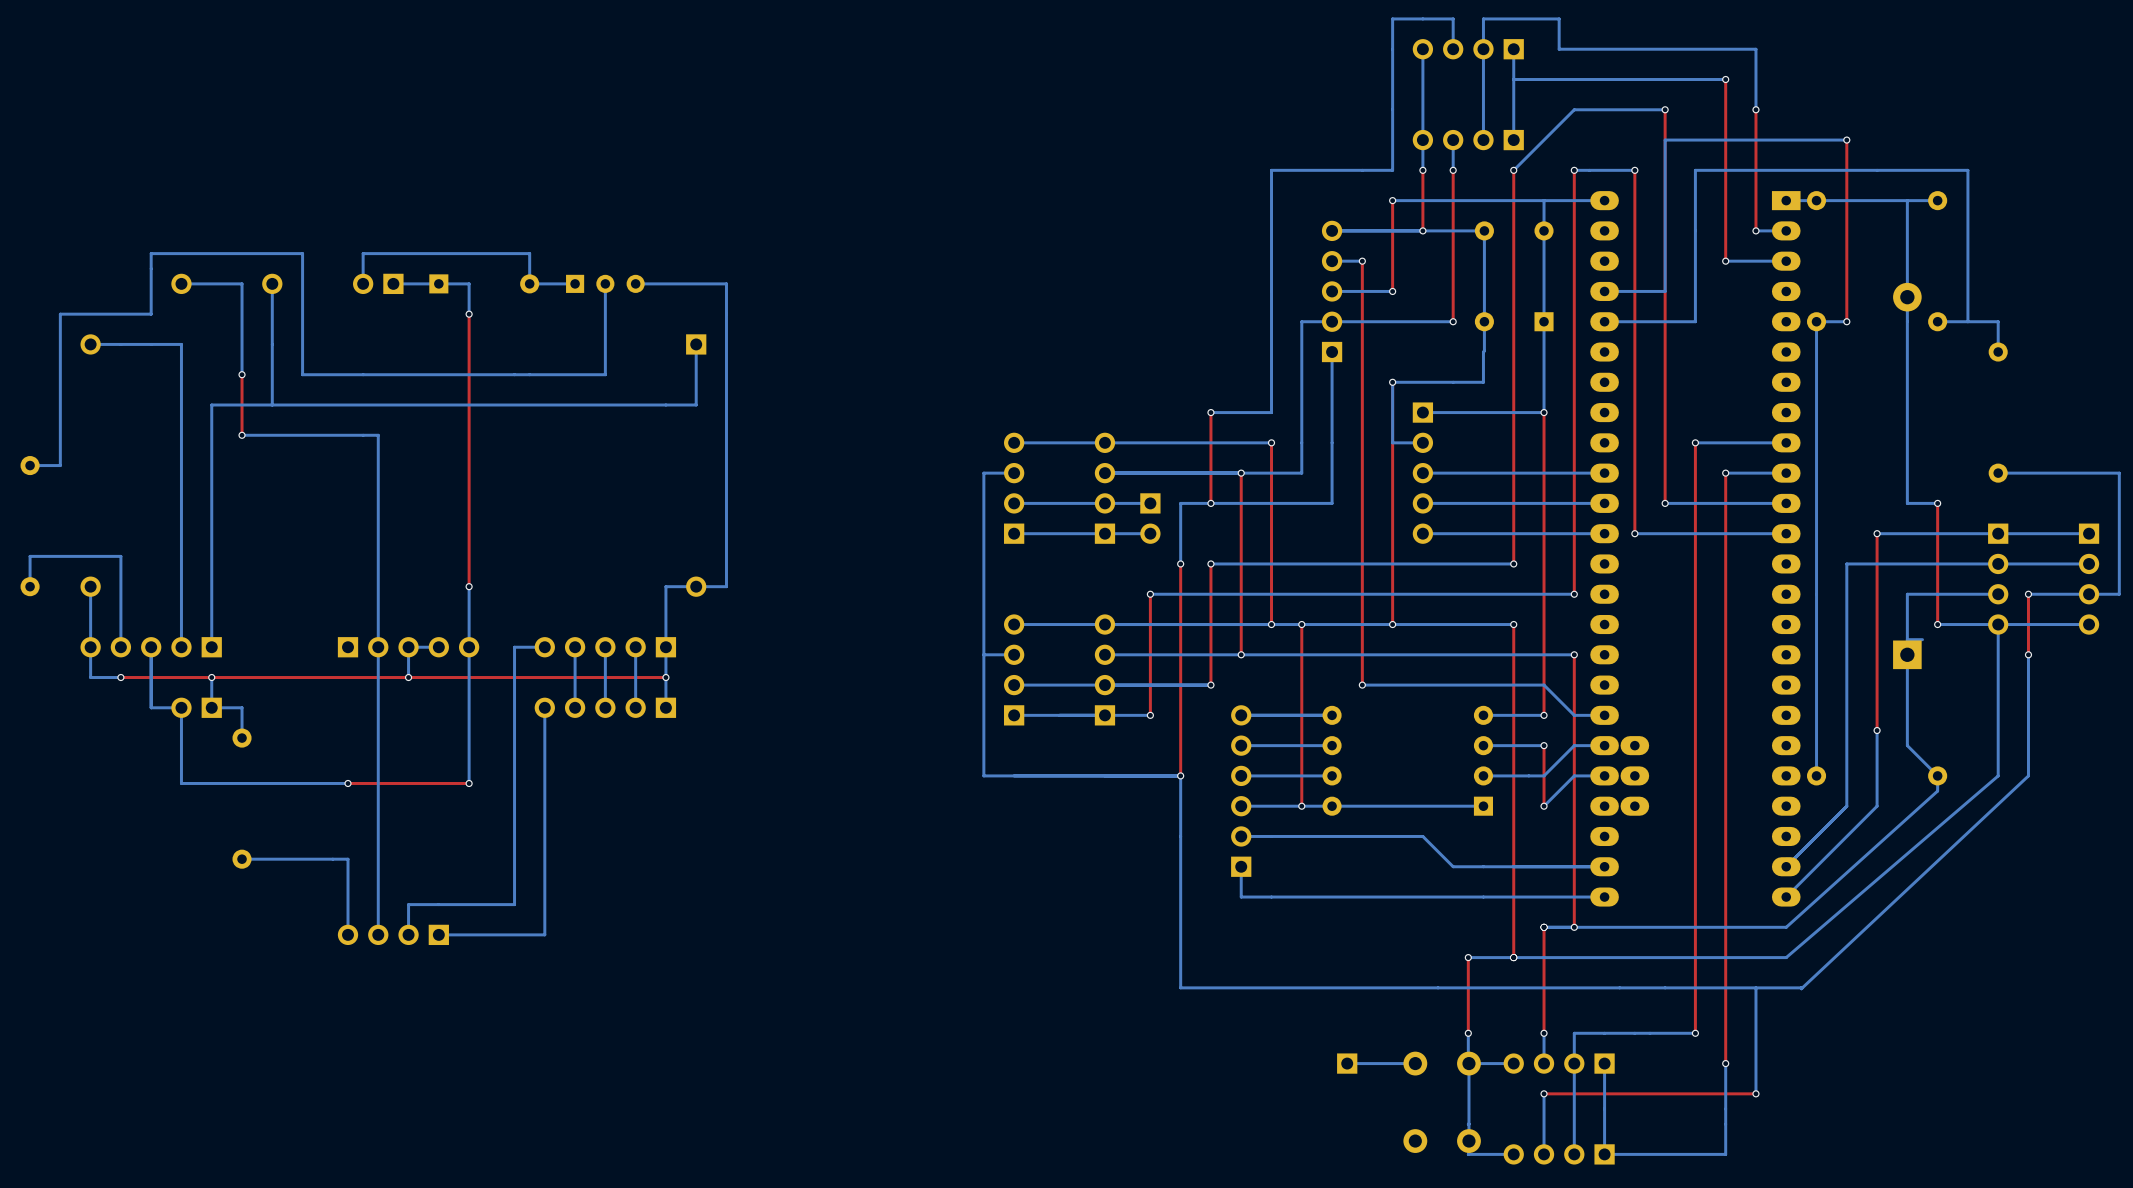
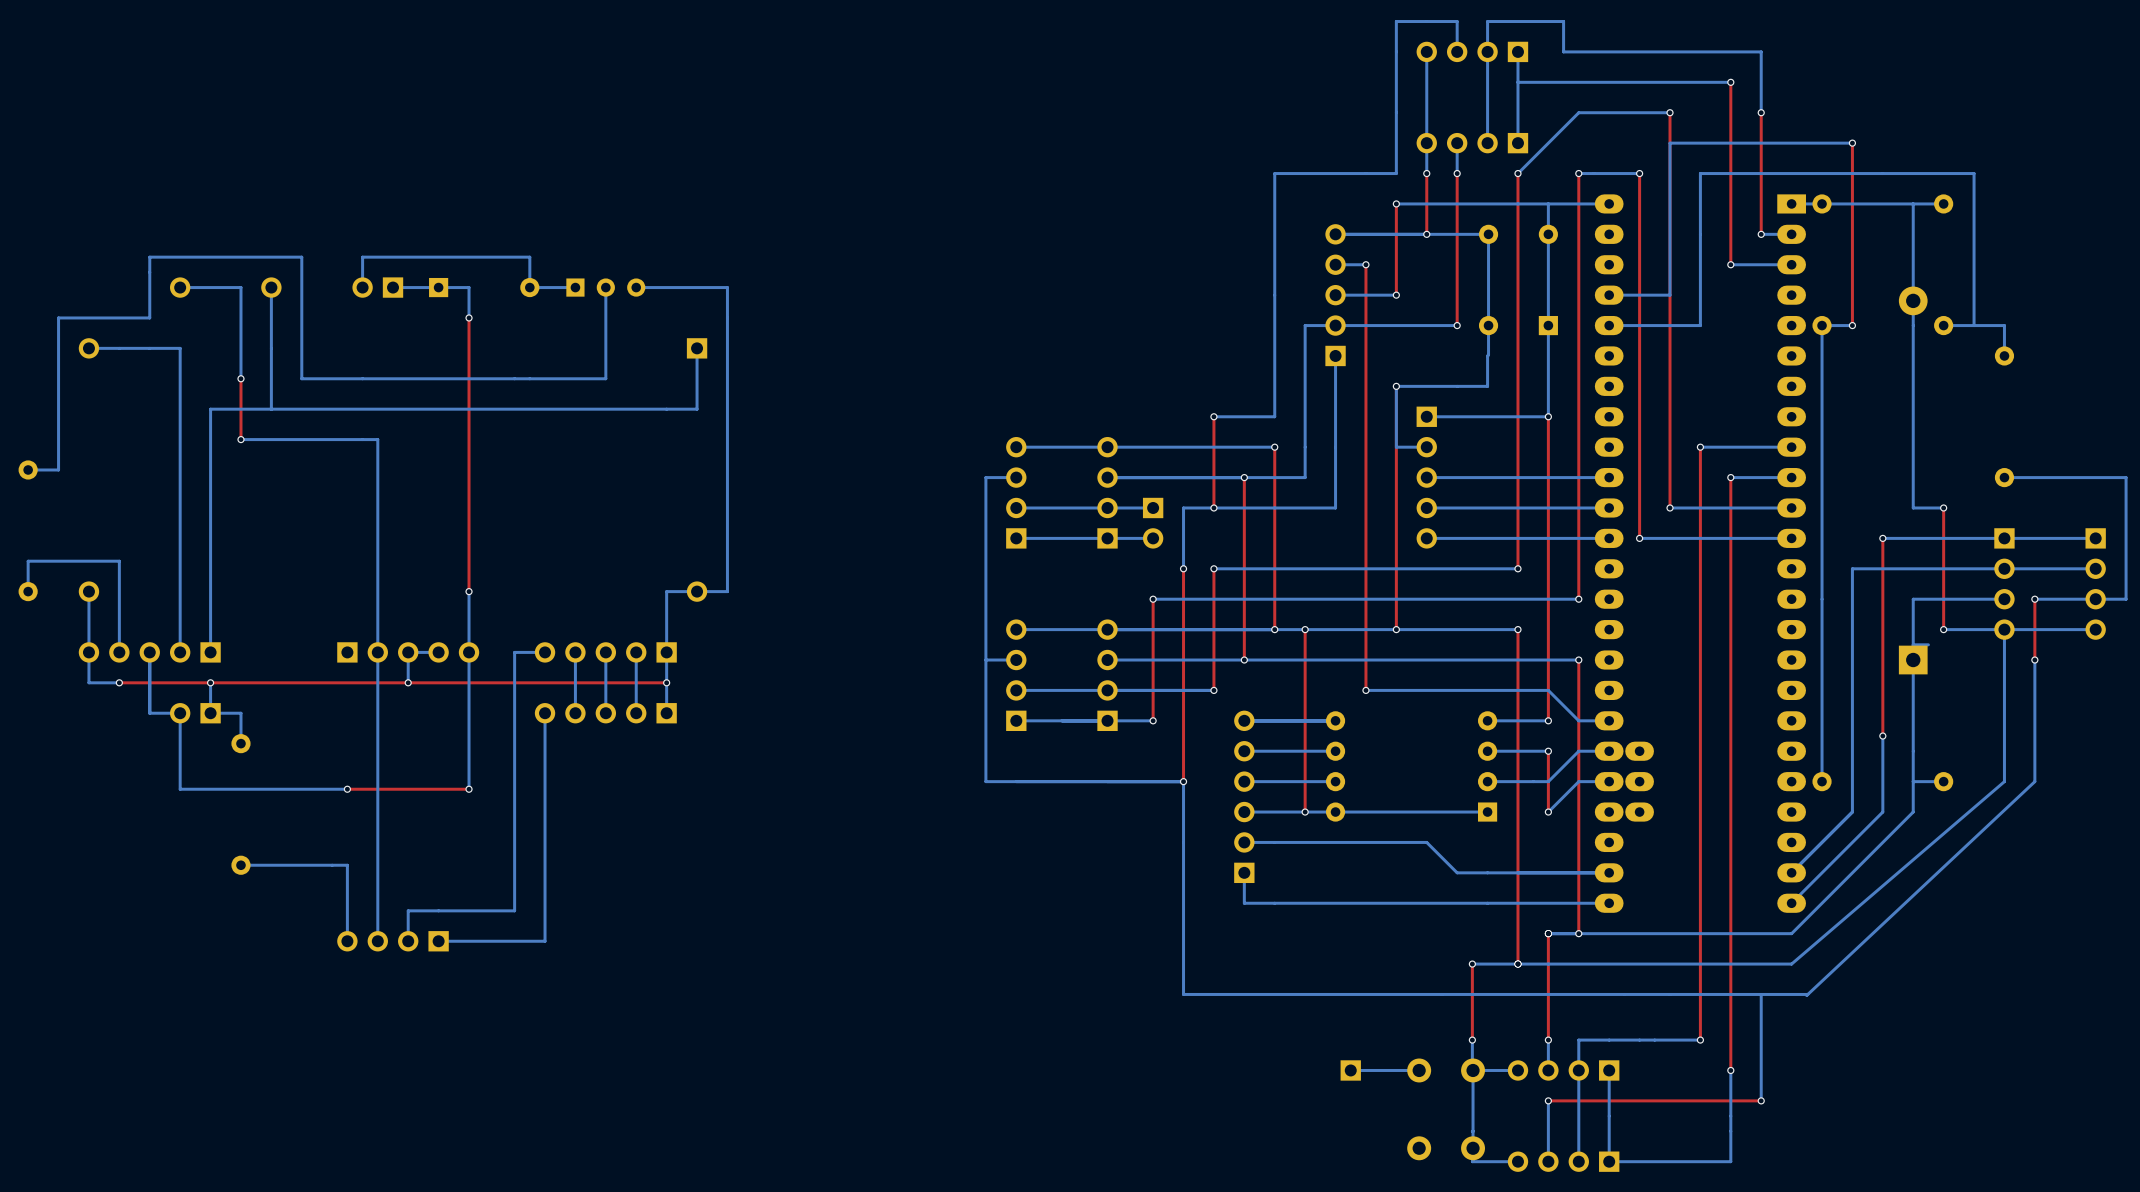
bottom track: (1907, 745) (1937, 775) (1937, 791) (1786, 927) -> (1913, 751) (1913, 812) (1791, 933)
bottom track: none -> (1943, 781) (1913, 781)

